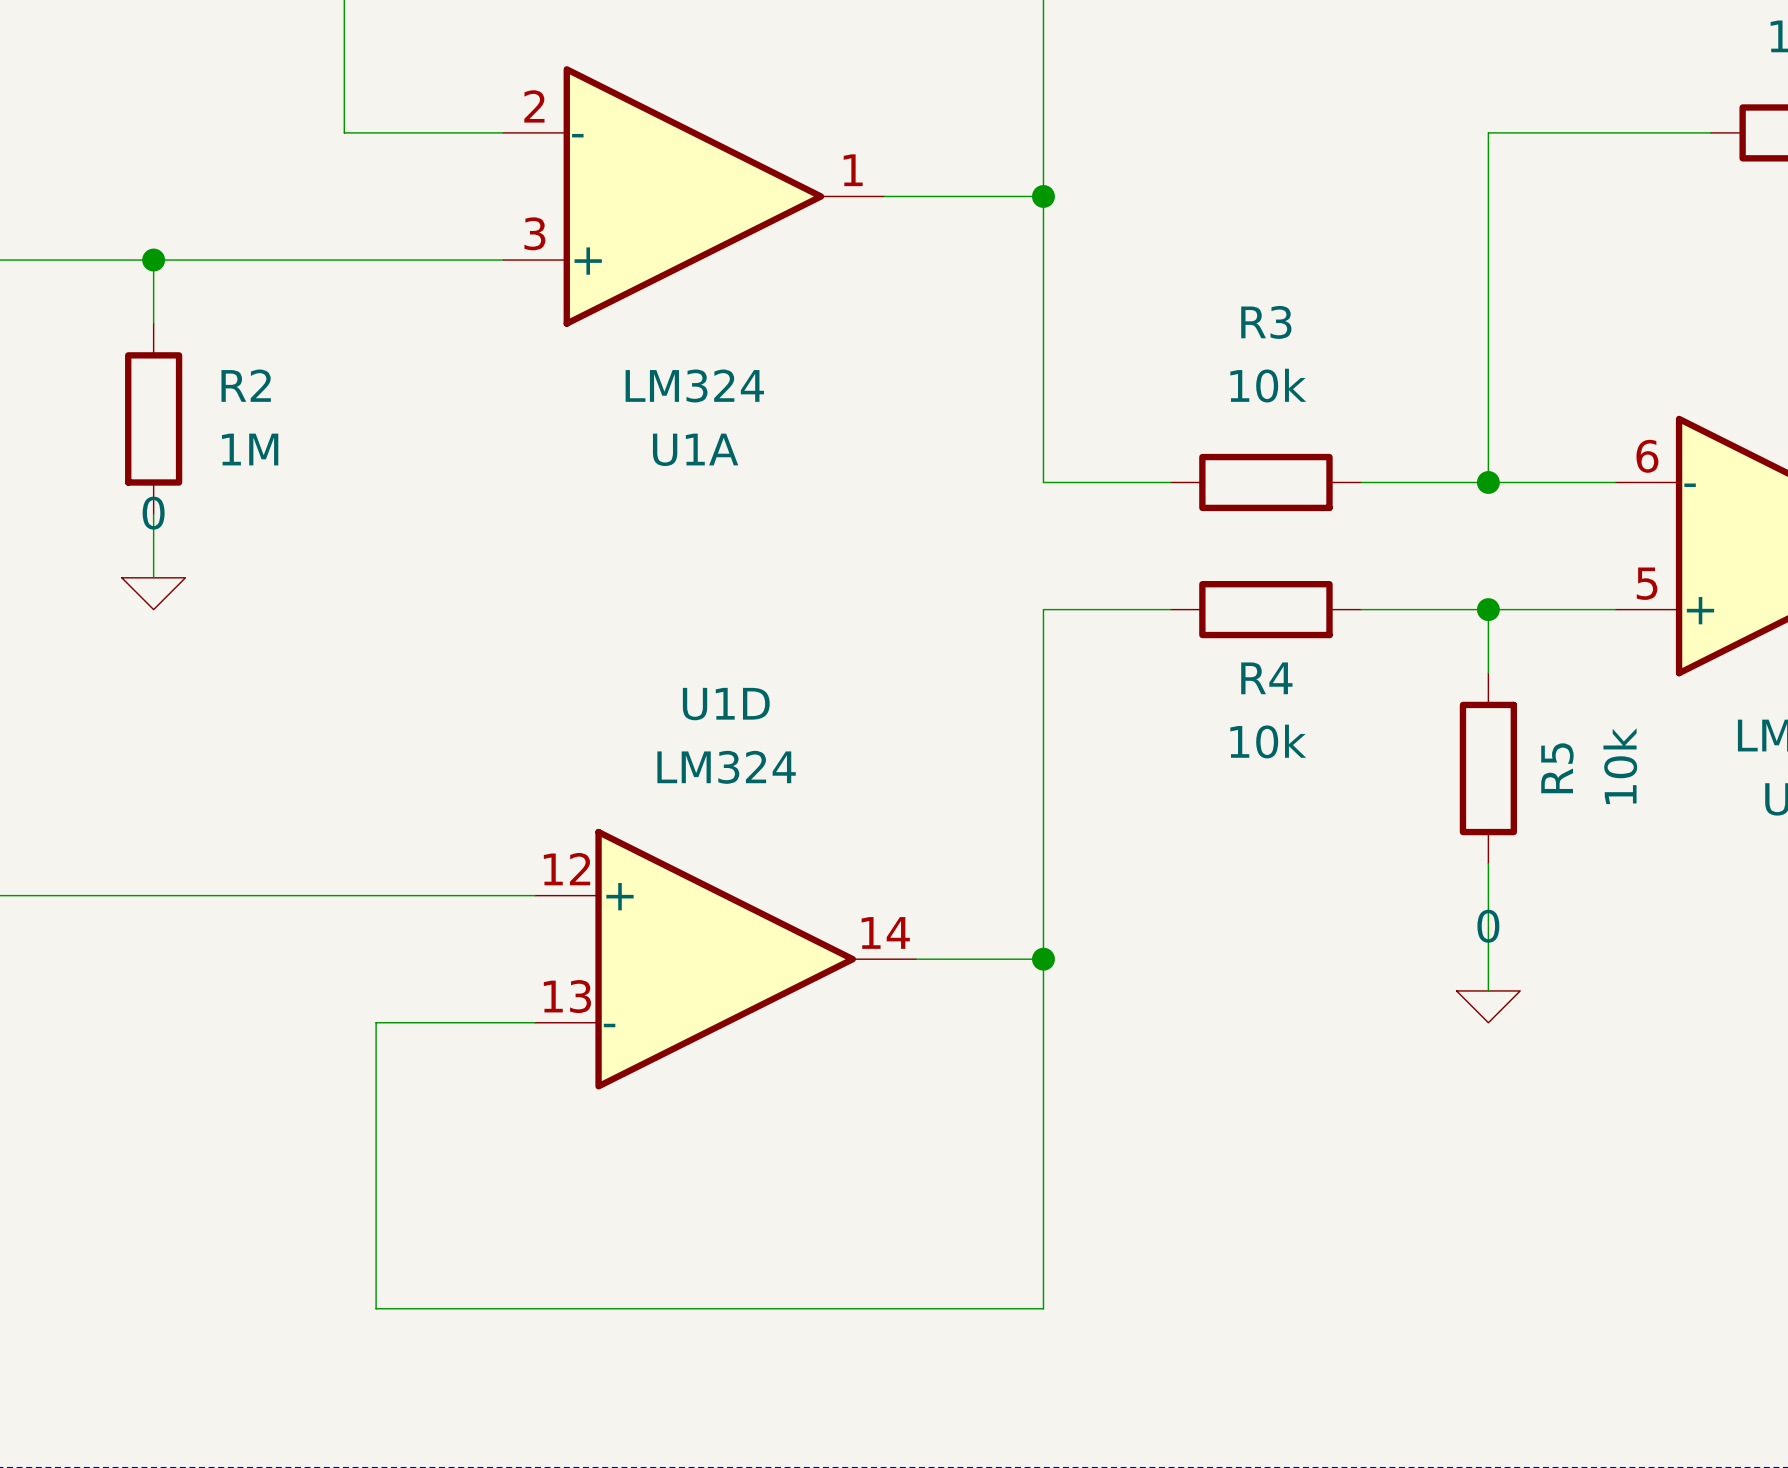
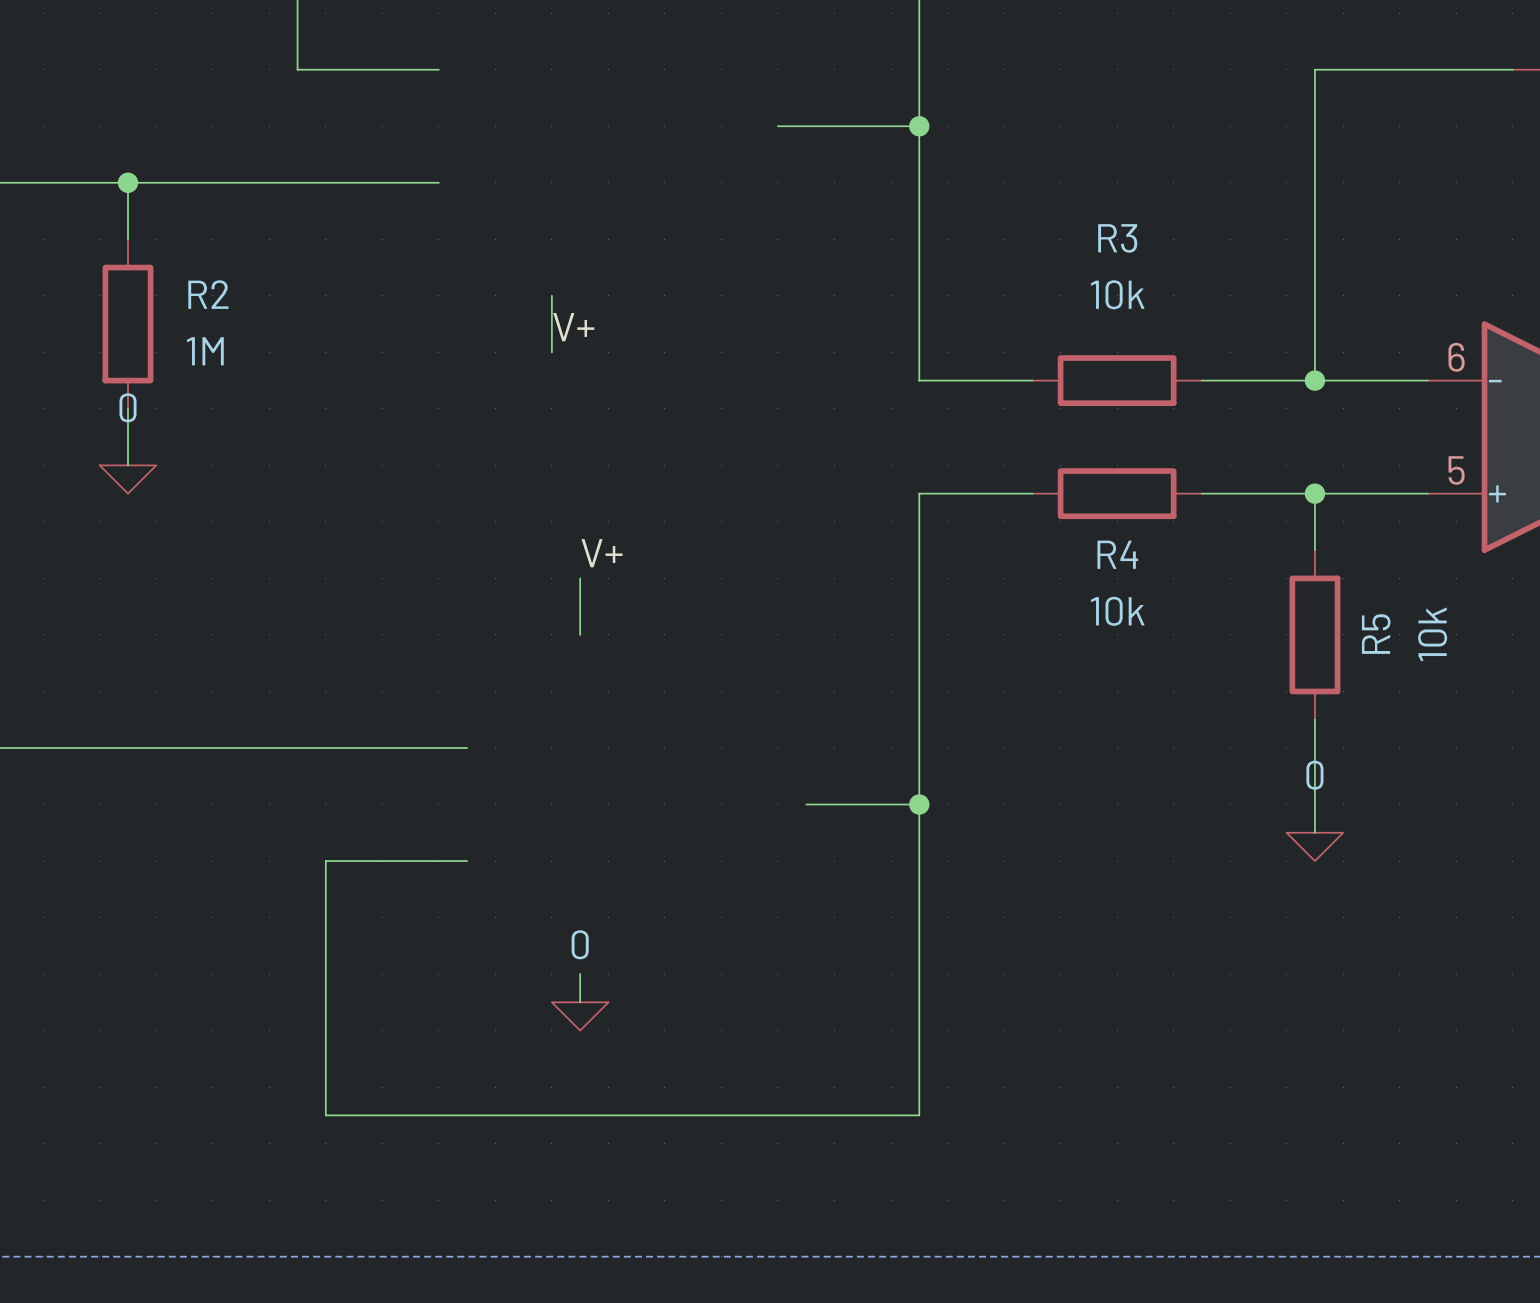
U1A: LM324 (693, 196) -> none
wire: none -> (551, 295) (551, 352)
label: none -> V+ (573, 327)
label: none -> V+ (602, 553)
wire: none -> (580, 578) (580, 634)
U1D: LM324 (725, 959) -> none
wire: none -> (580, 974) (580, 1002)
power symbol: none -> 0 (580, 1016)

